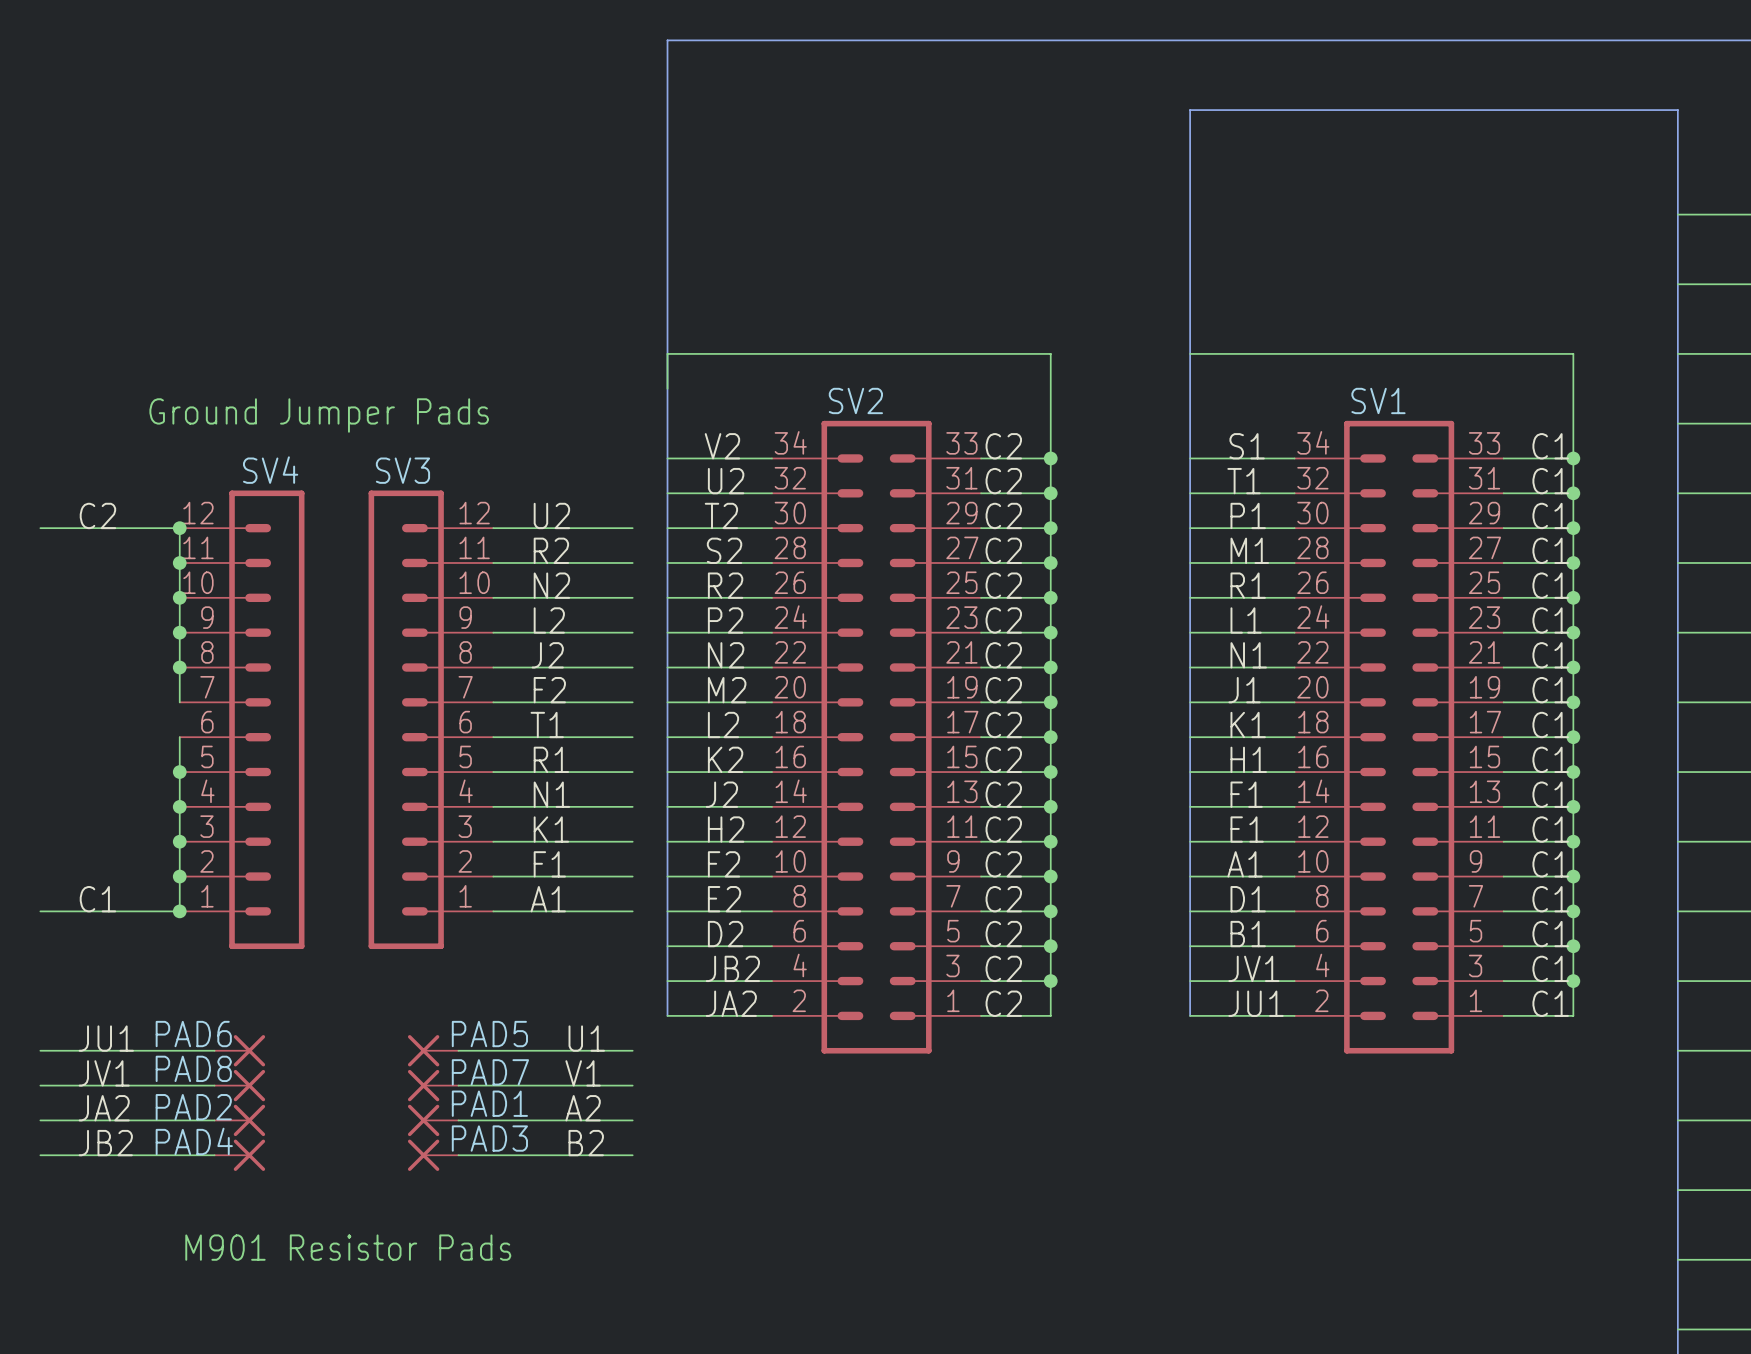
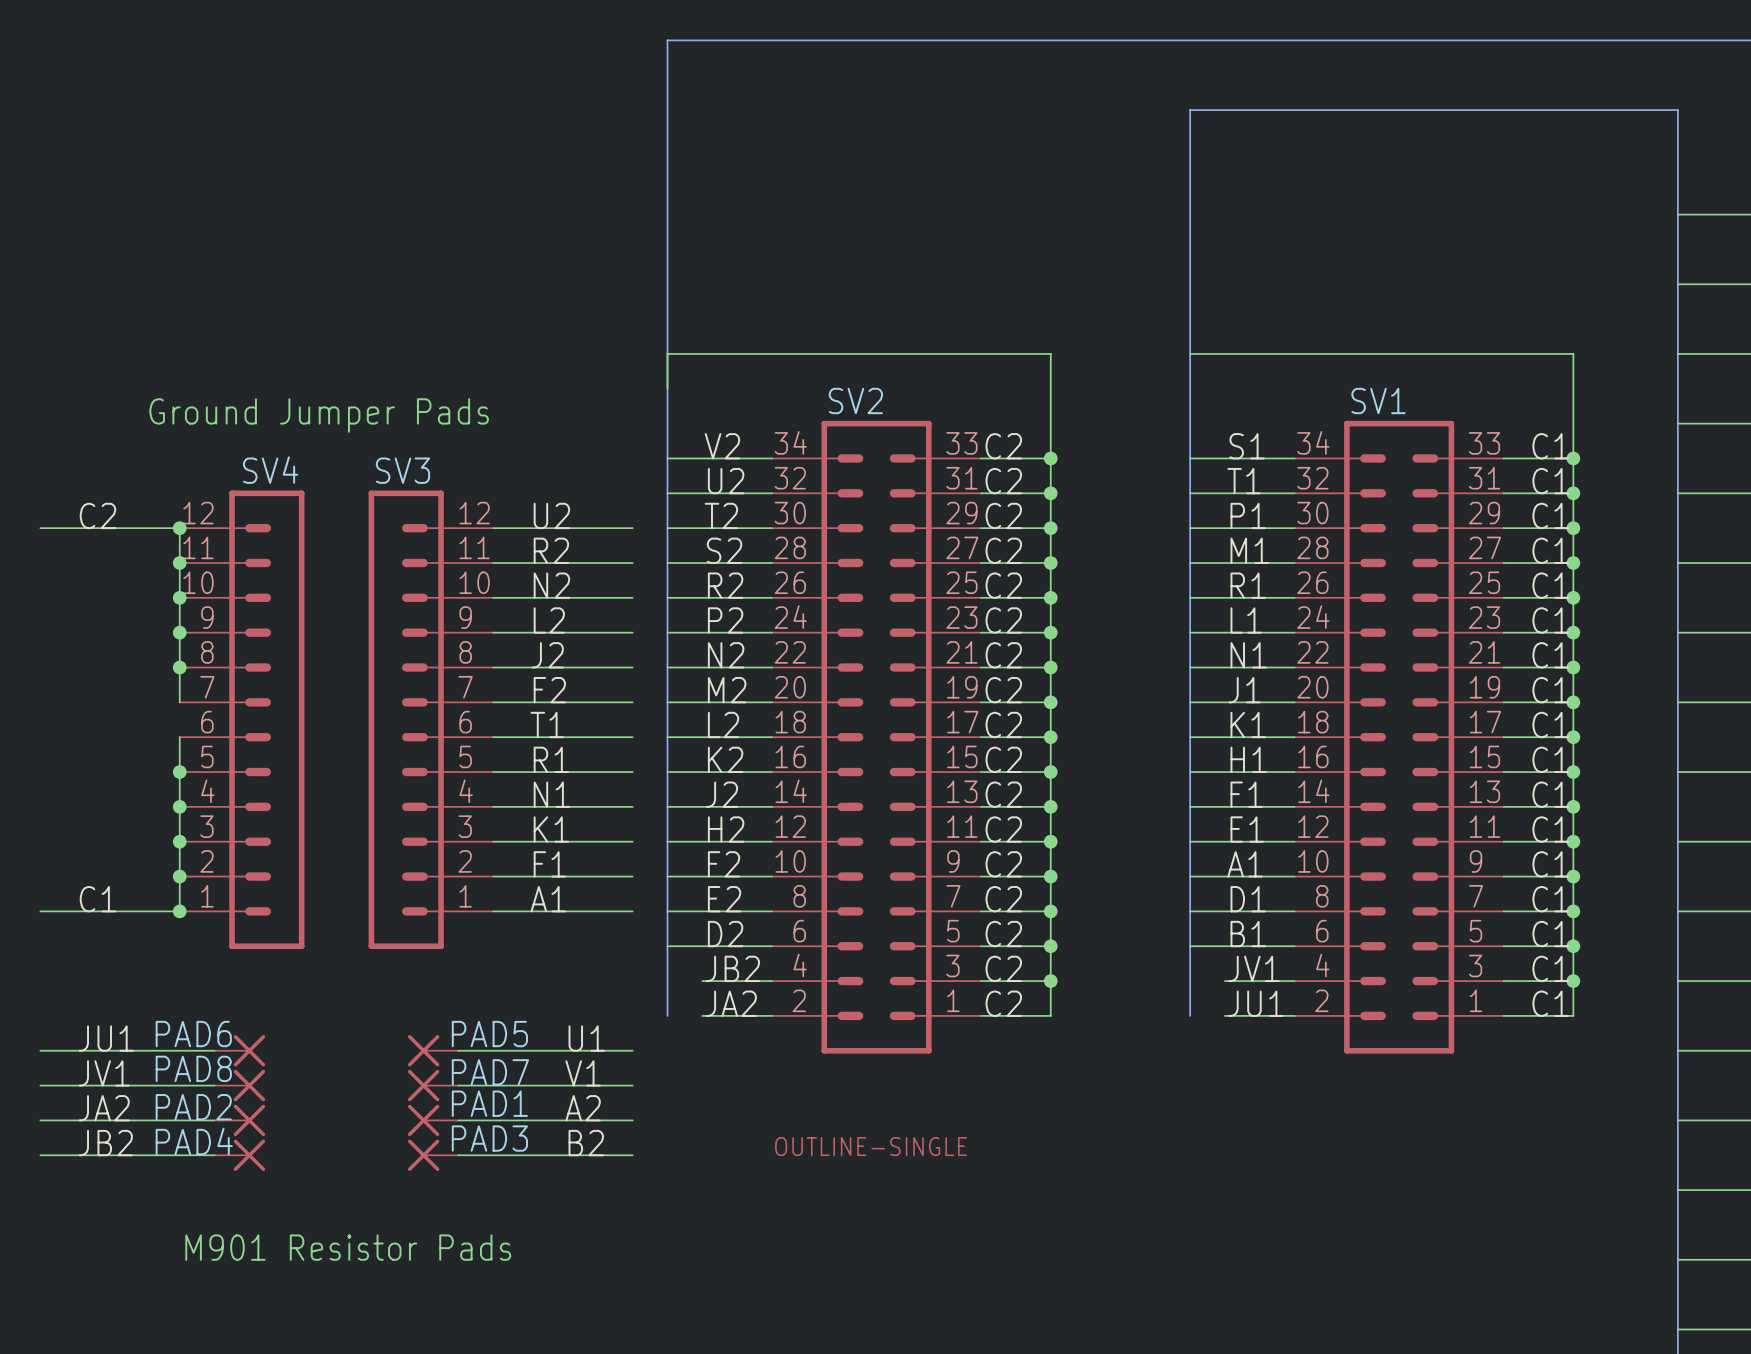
wire: (667, 981) (702, 981) -> none
wire: (1190, 981) (1224, 981) -> none
wire: (667, 1015) (702, 1015) -> none
wire: (1190, 1015) (1224, 1015) -> none
part: none -> OUTLINE-SINGLE (871, 1146)

